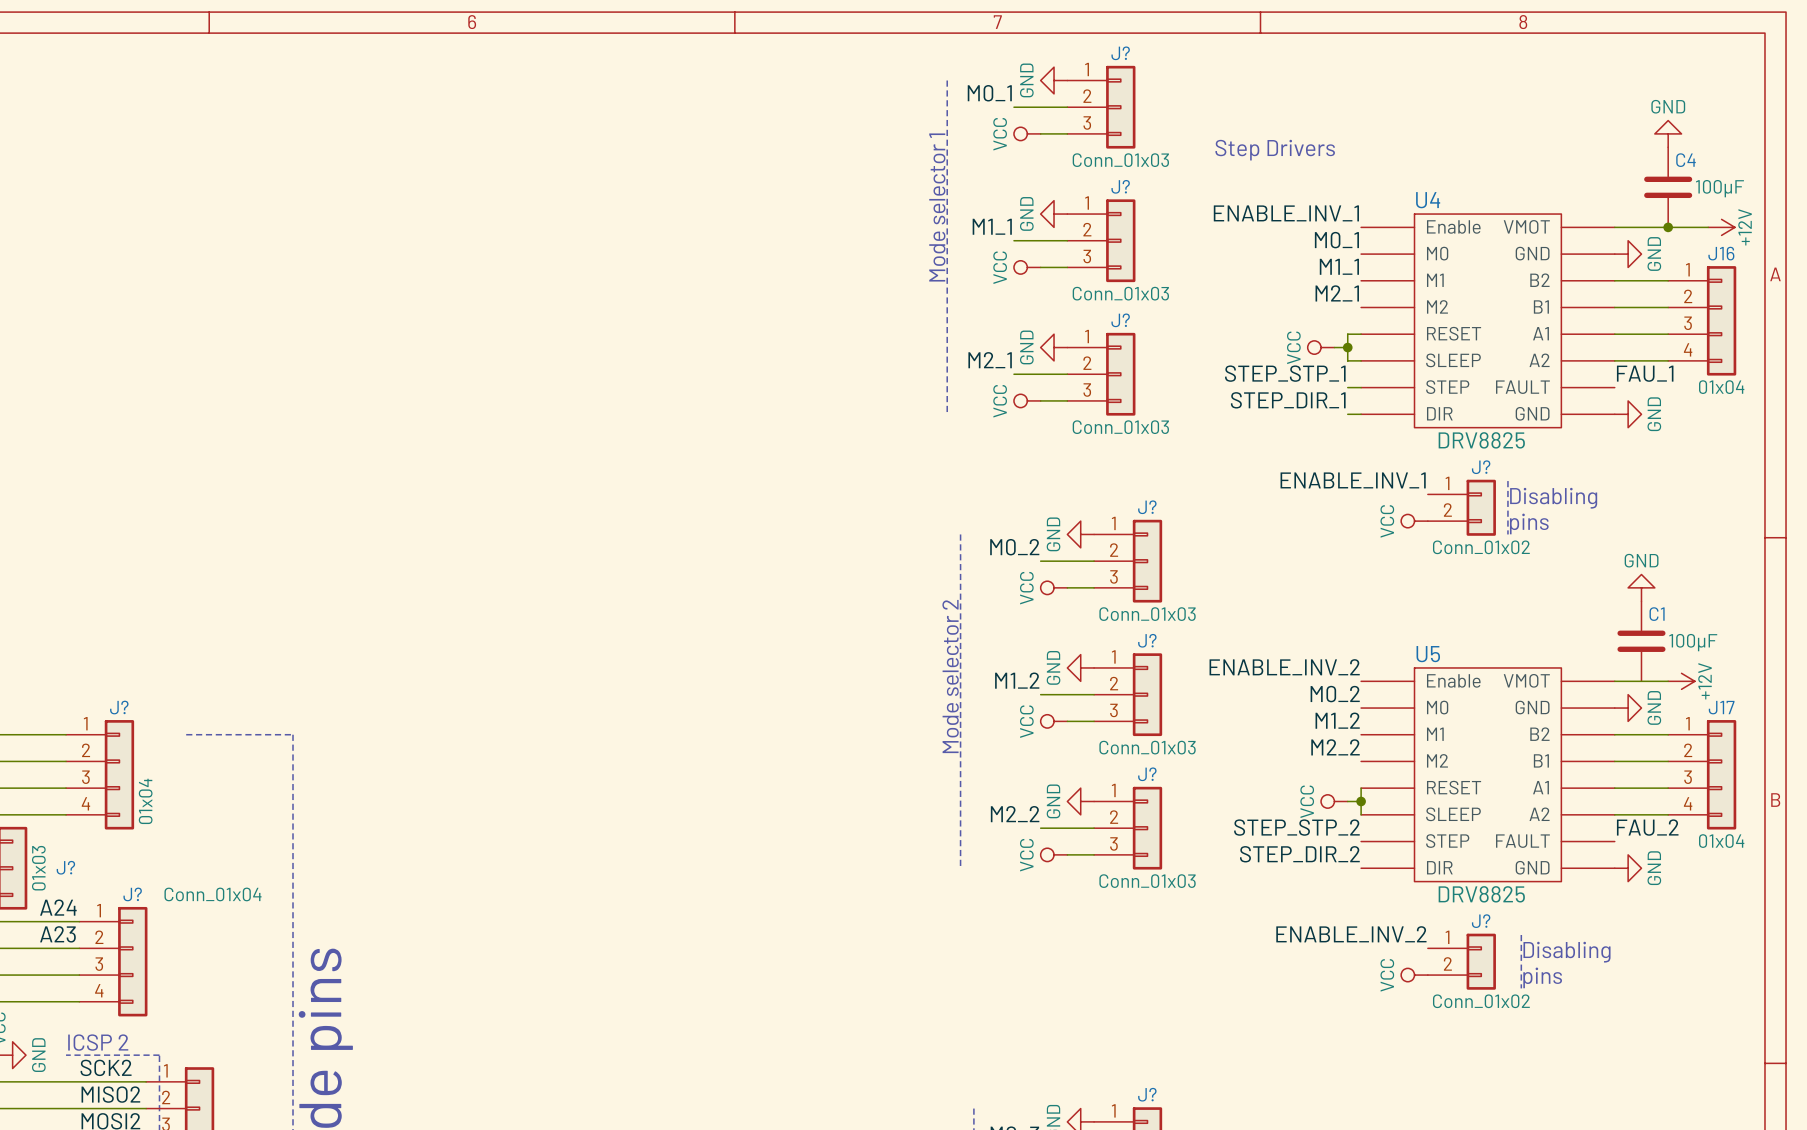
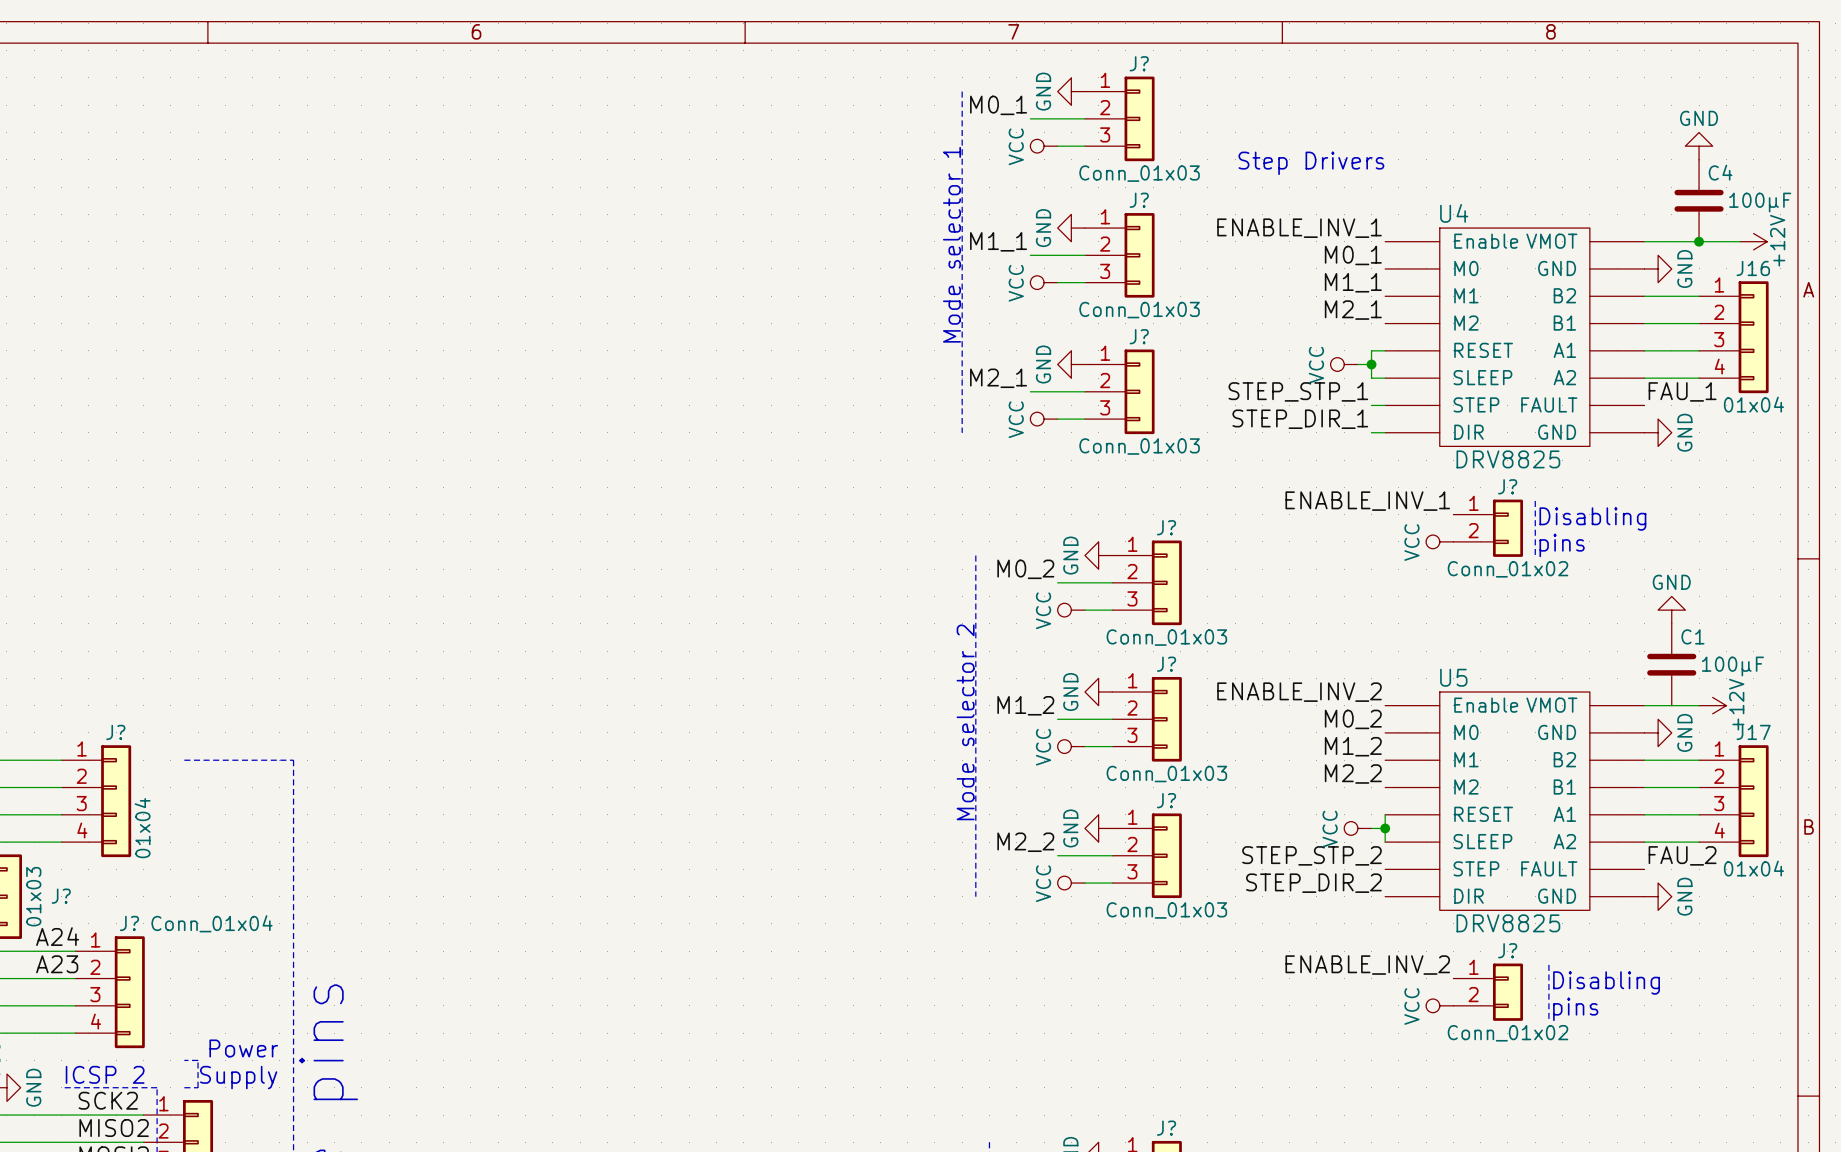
text: none -> Power (243, 1048)
line: none -> (184, 1060) (198, 1060) (198, 1087) (184, 1087)
text: none -> Supply (238, 1077)

